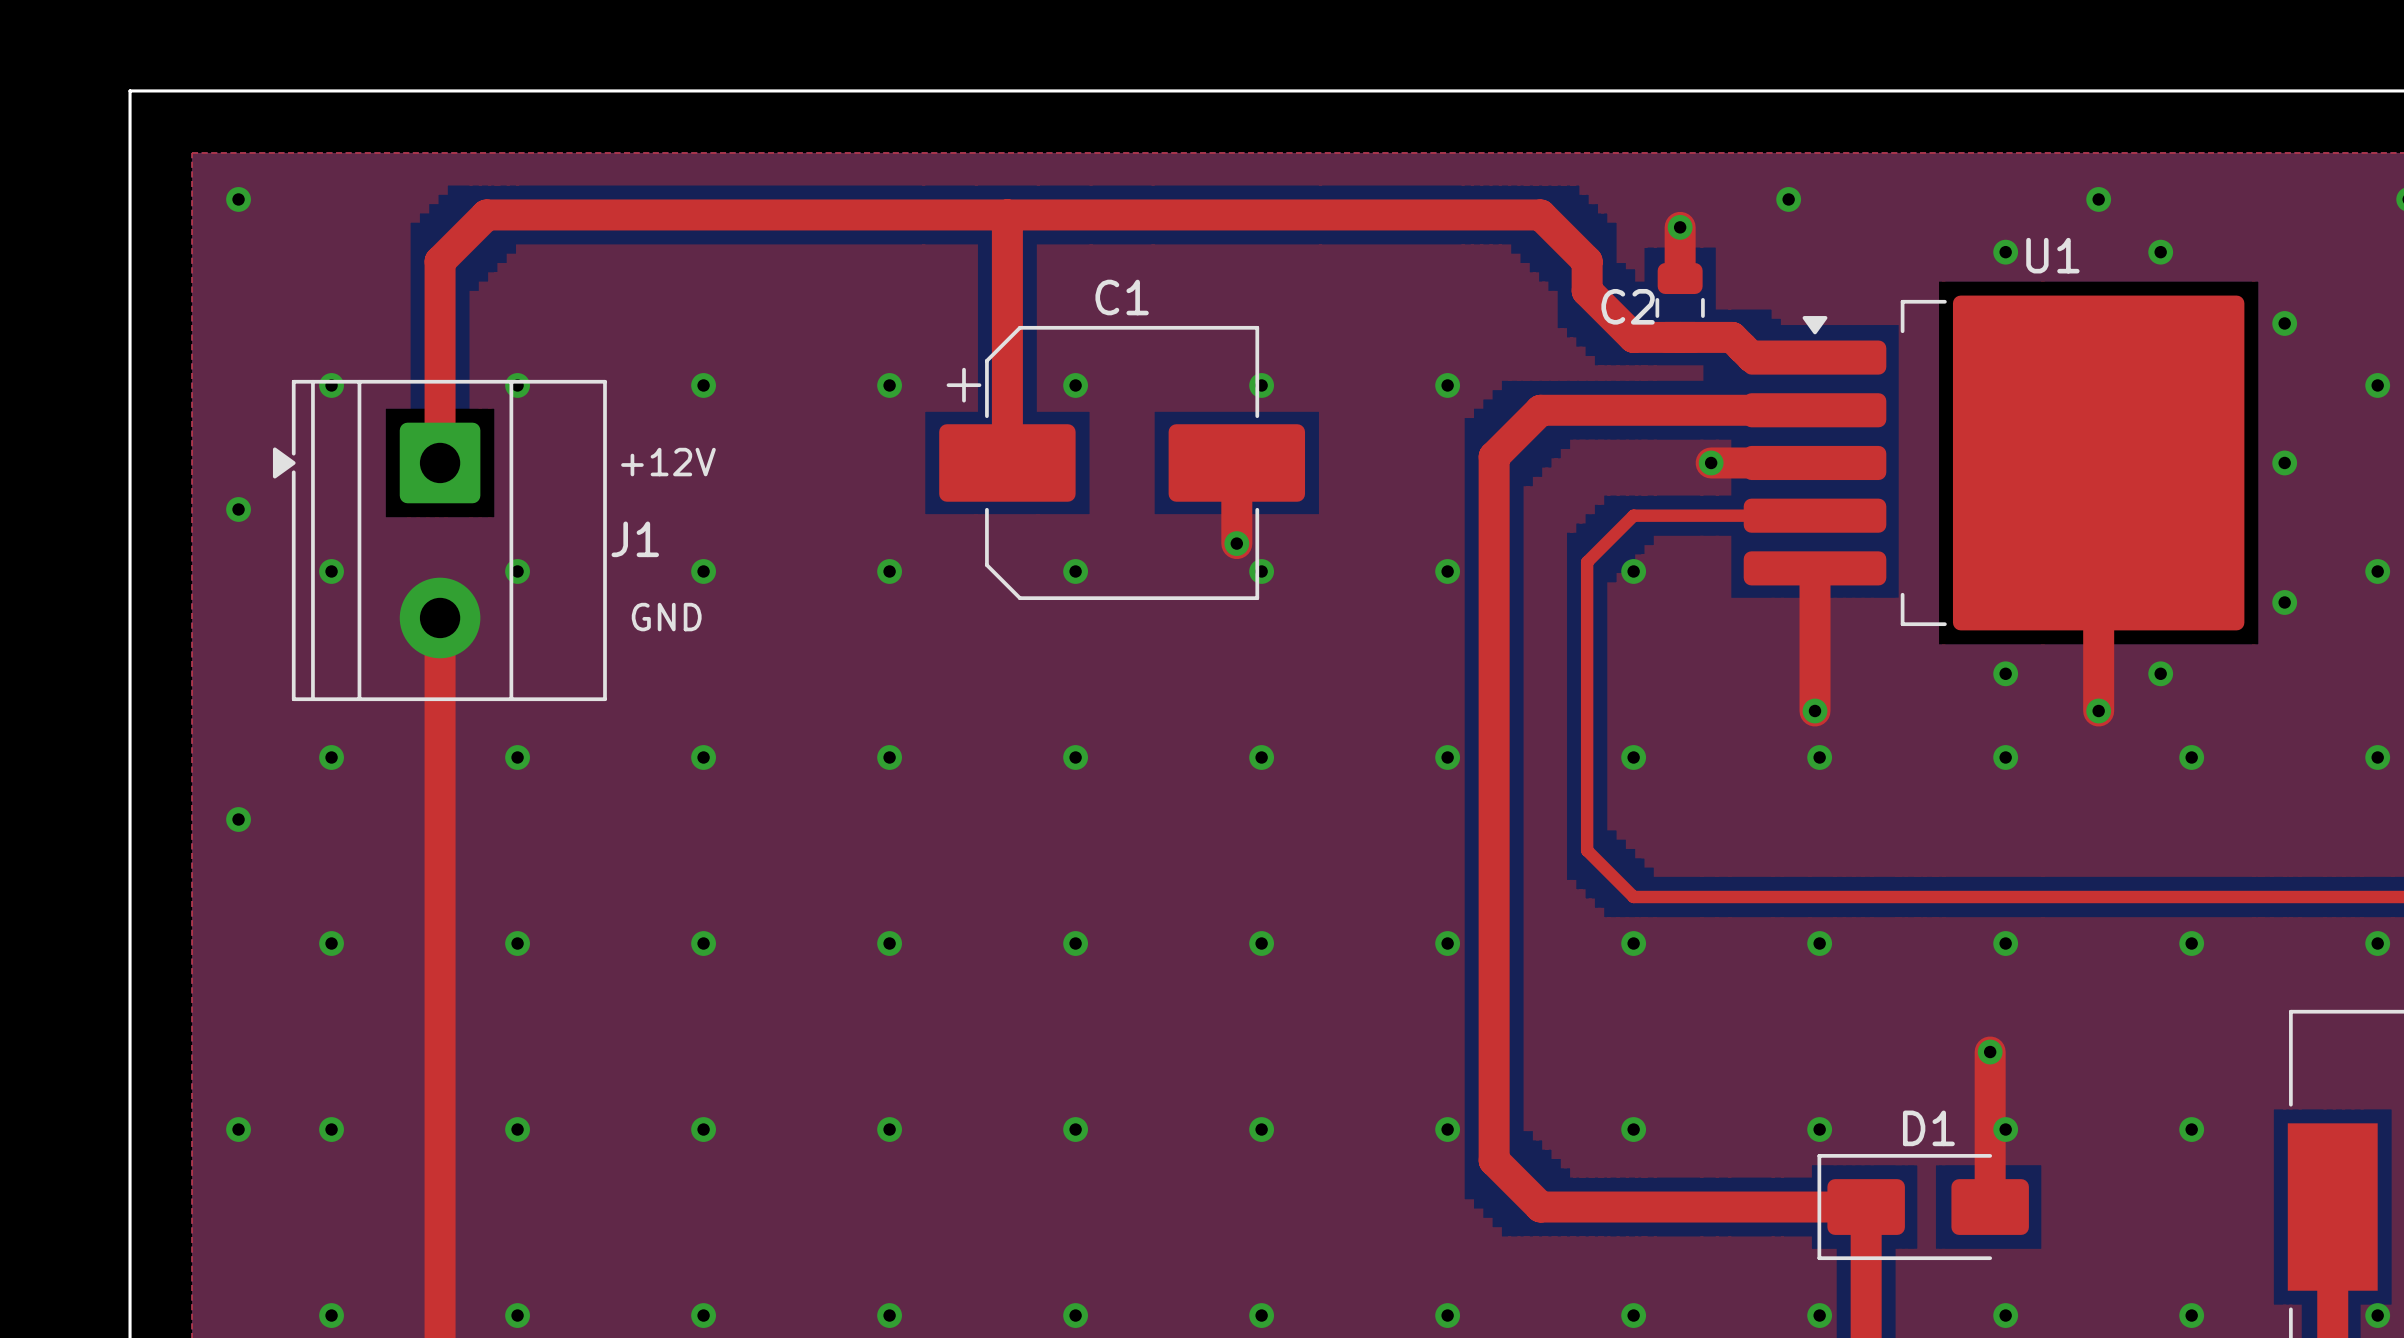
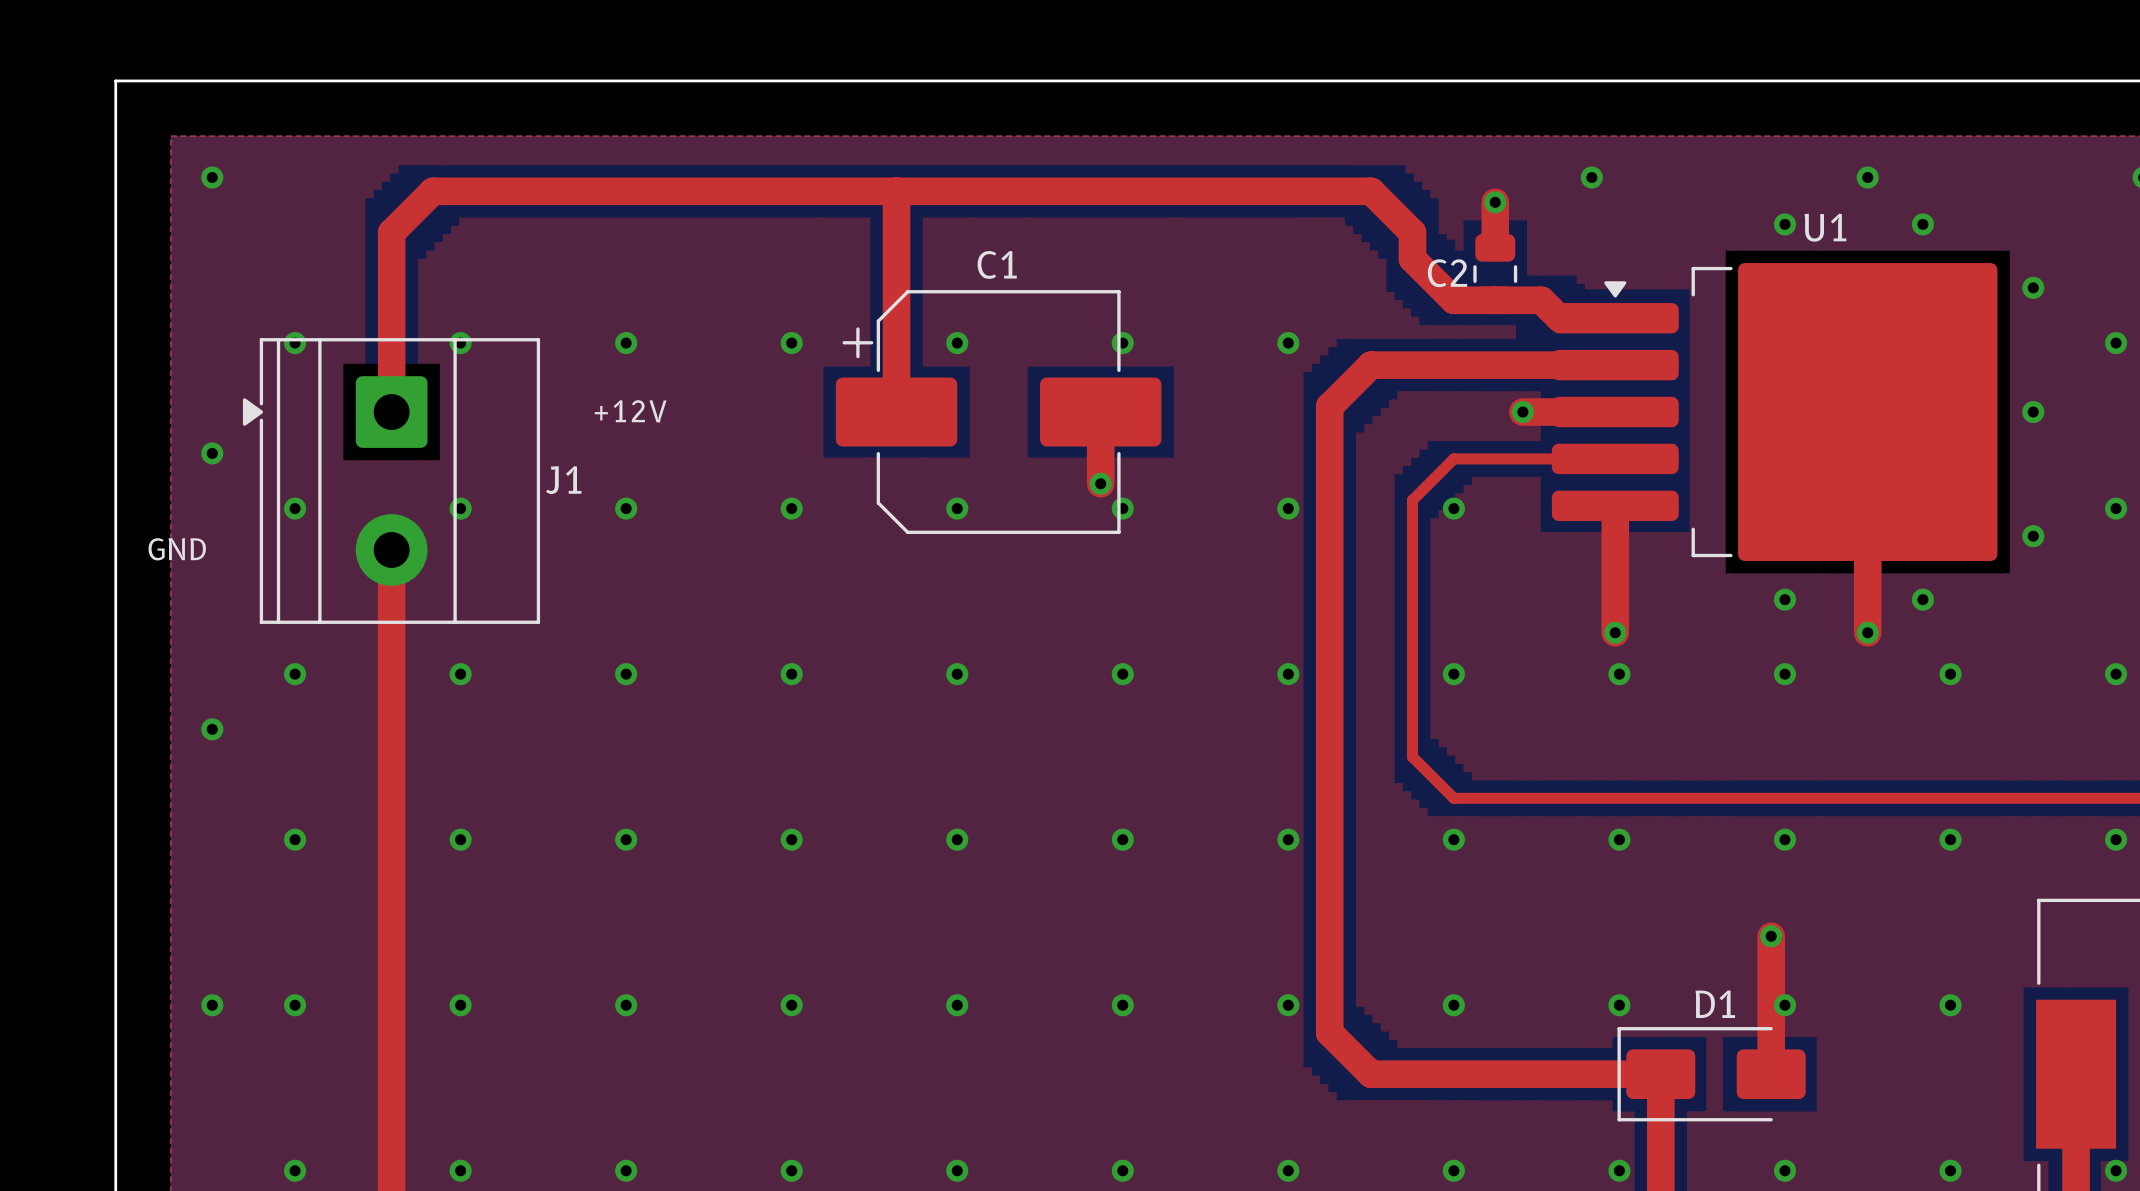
text position: +12V (668, 462) -> +12V (630, 411)
text position: GND (666, 617) -> GND (177, 549)

